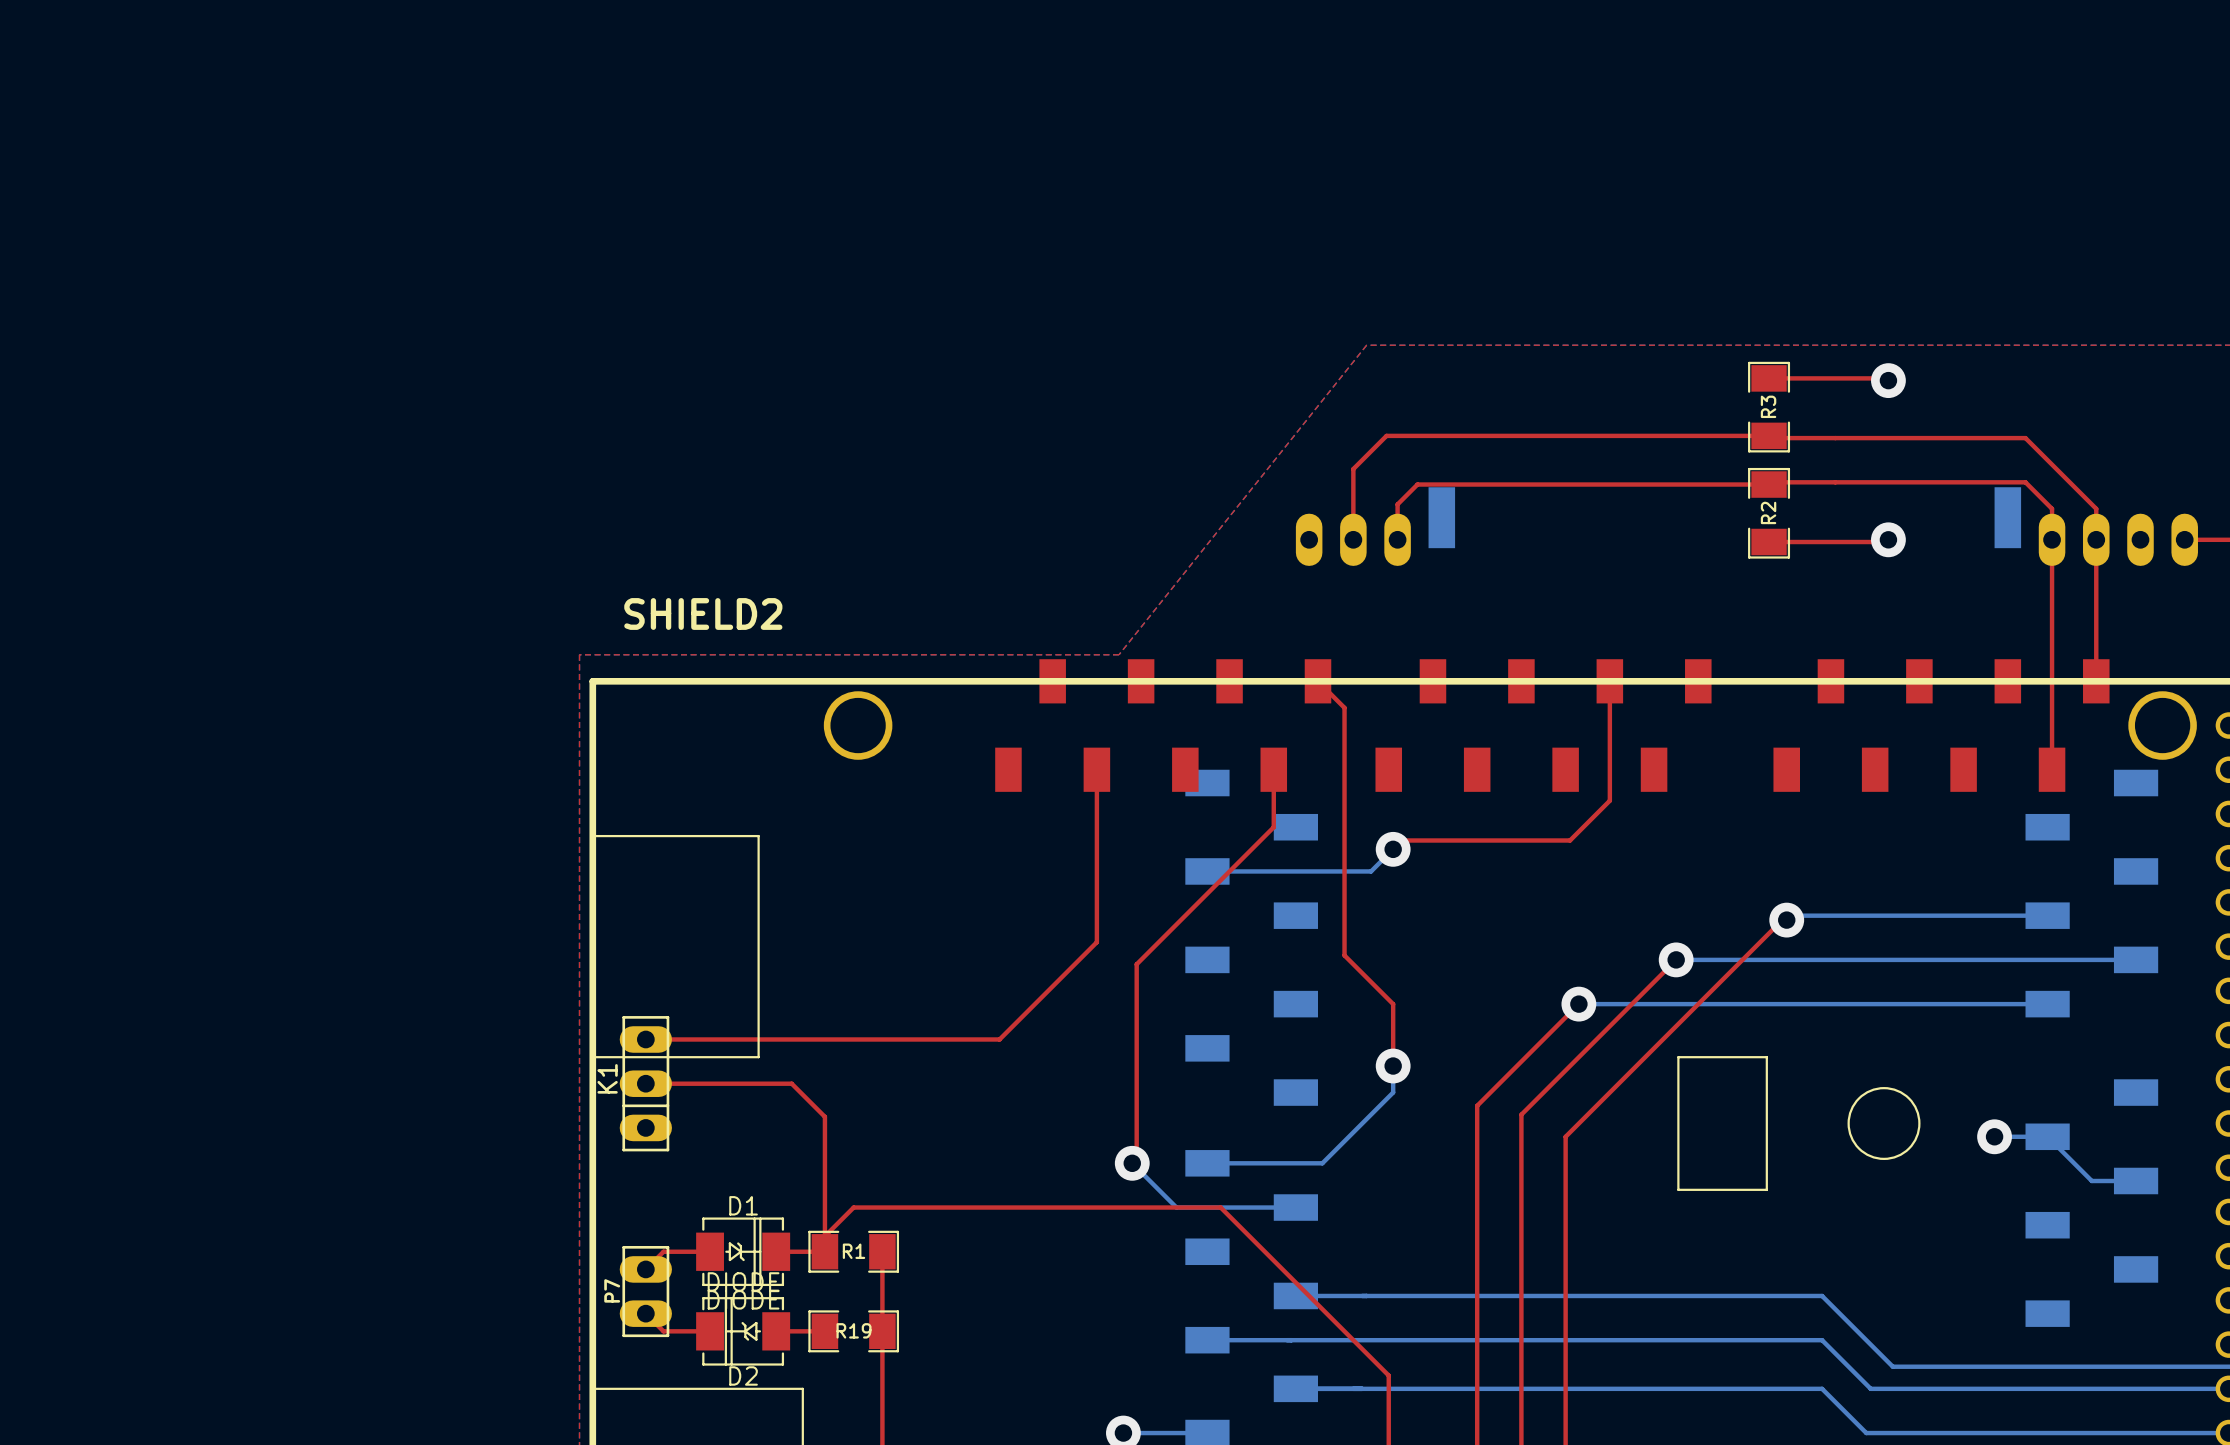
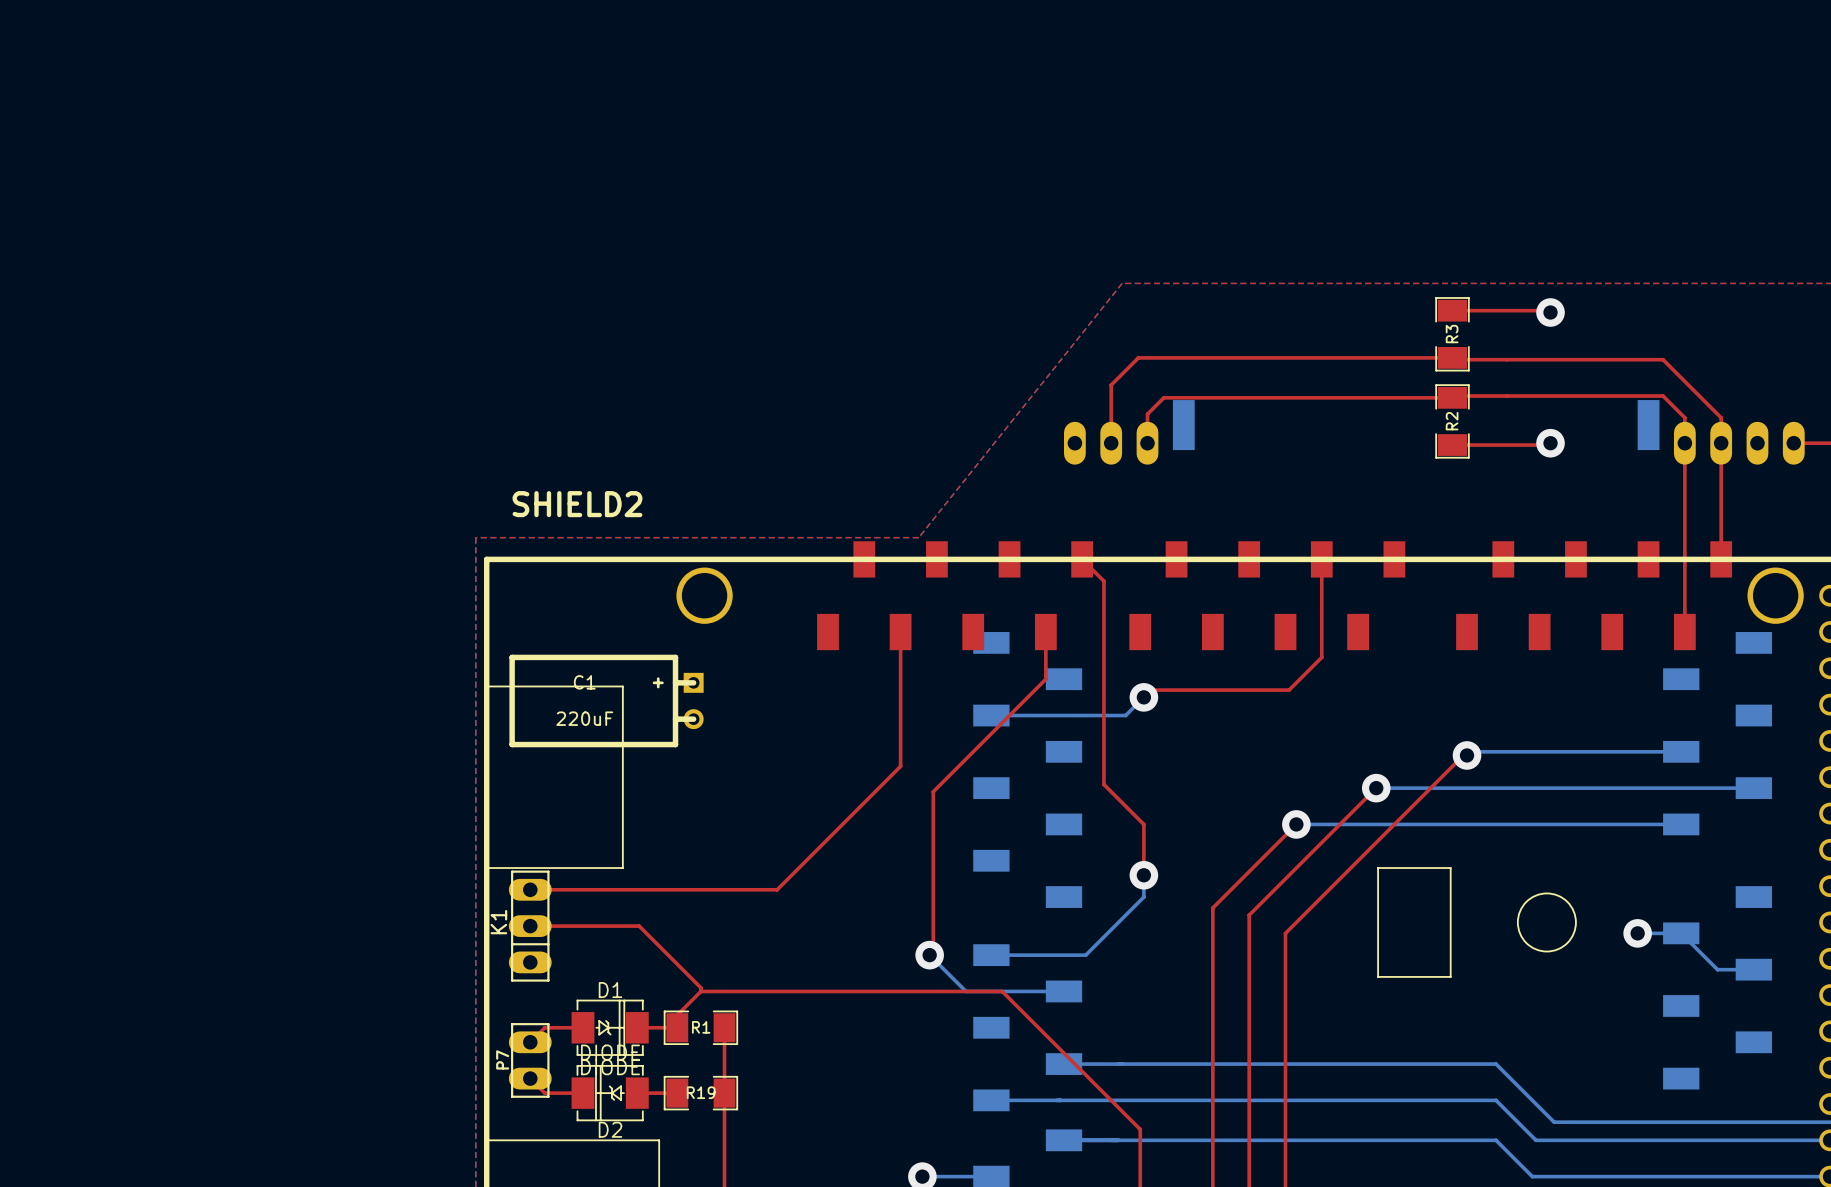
C1: none -> 220uF (606, 701)
top track: (1096, 933) (1096, 942) (999, 1039) (645, 1039) -> (900, 766) (777, 889) (650, 889)
K1 position: (645, 1083) -> (530, 926)
top track: (791, 1083) (824, 1116) (824, 1236) -> none
top track: none -> (530, 926) (639, 926) (700, 987) (700, 991)

